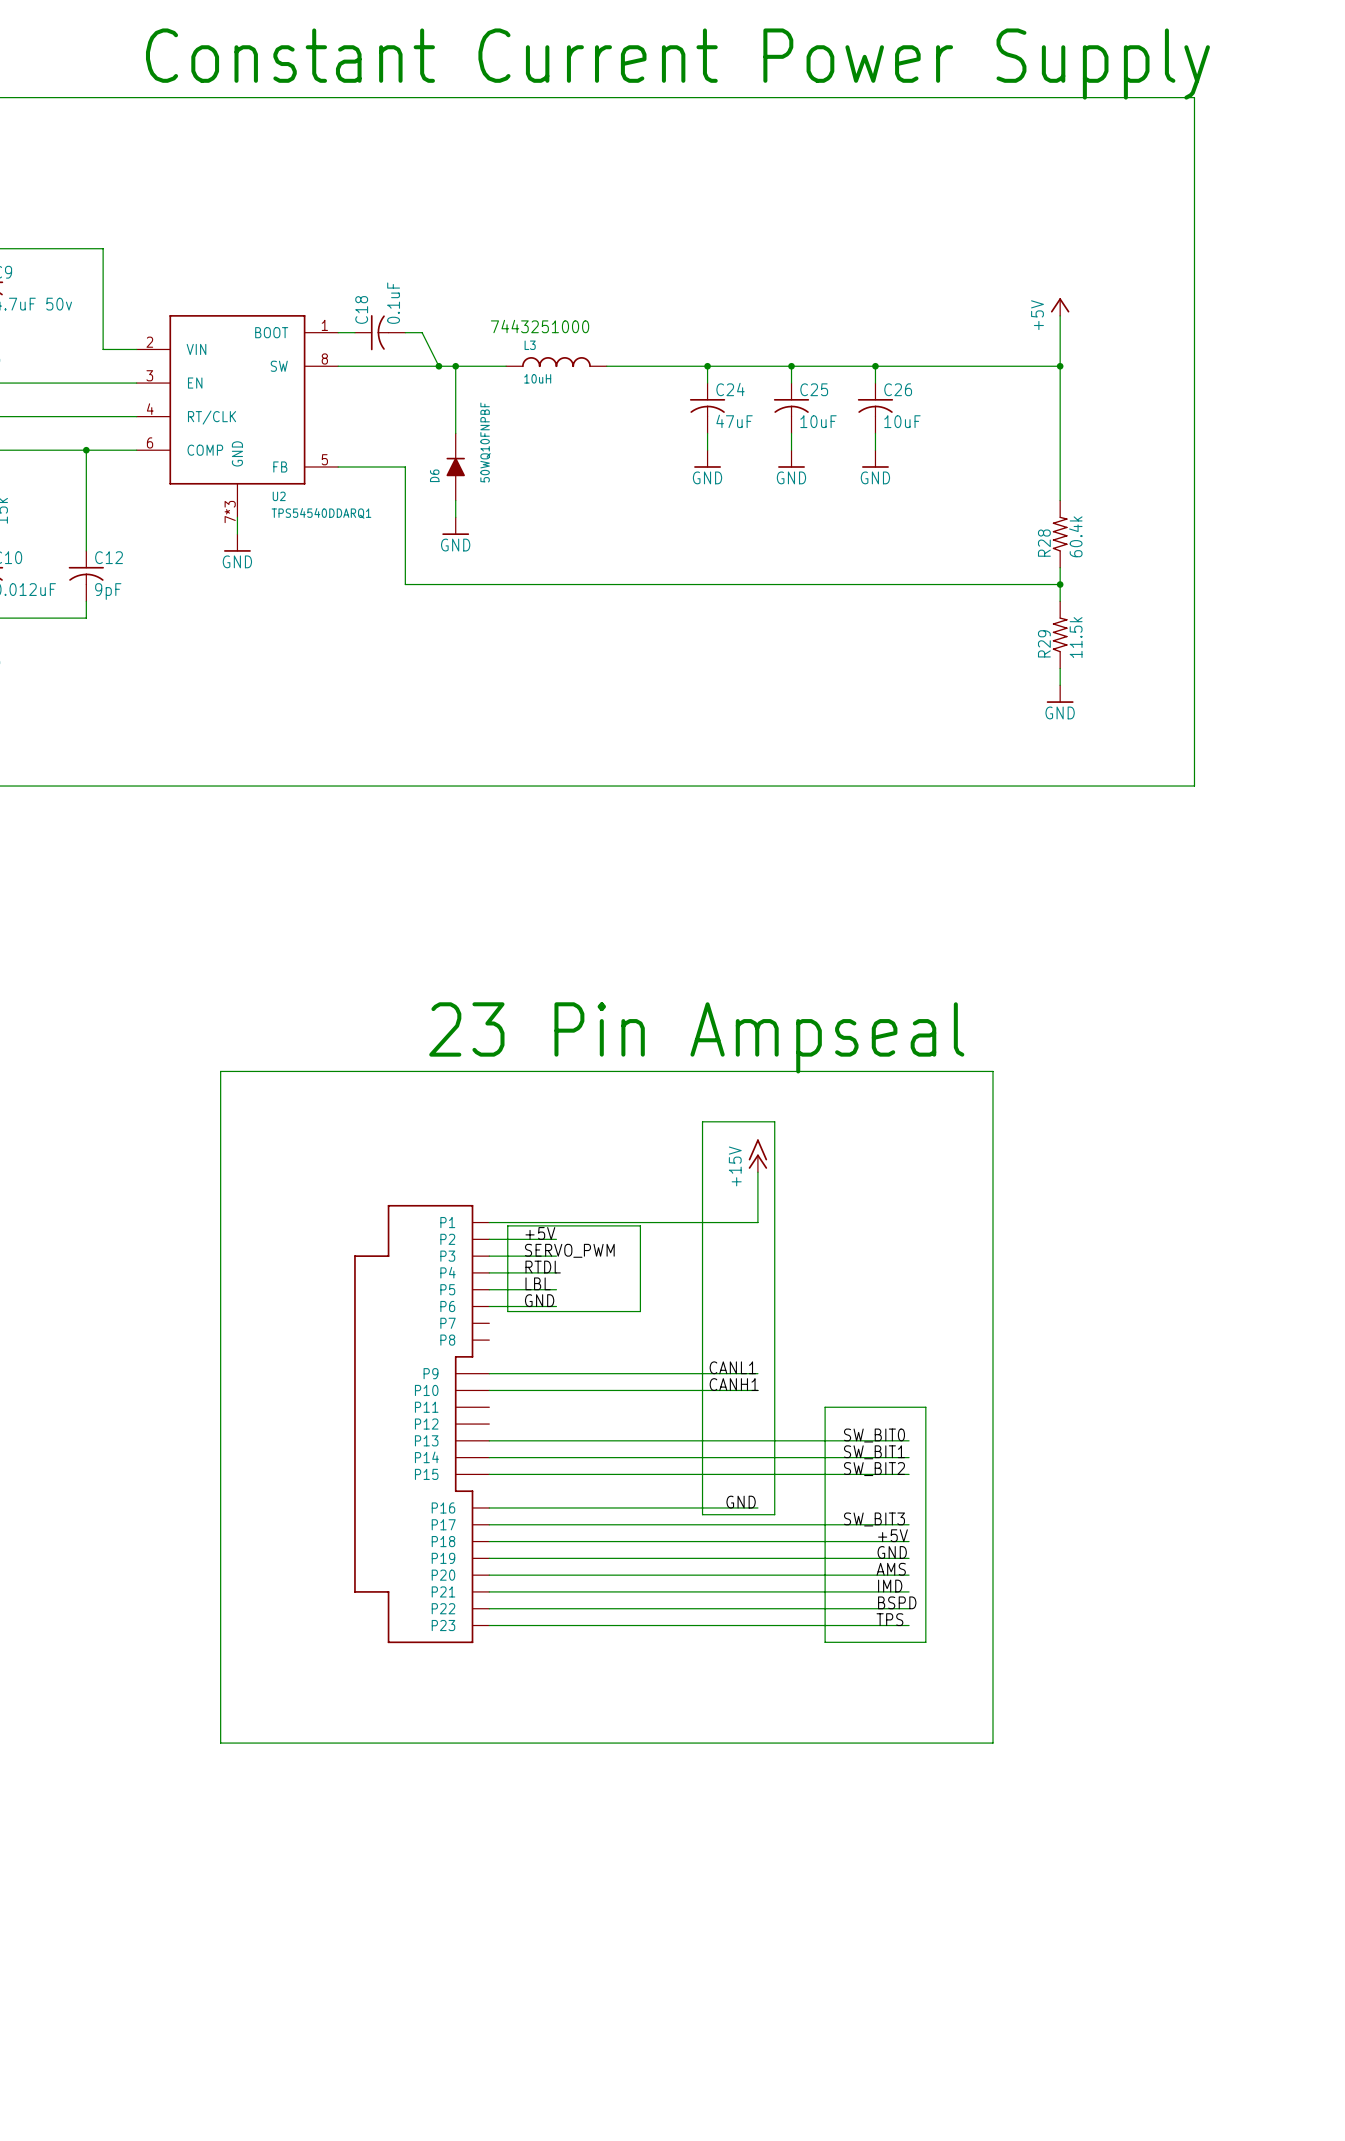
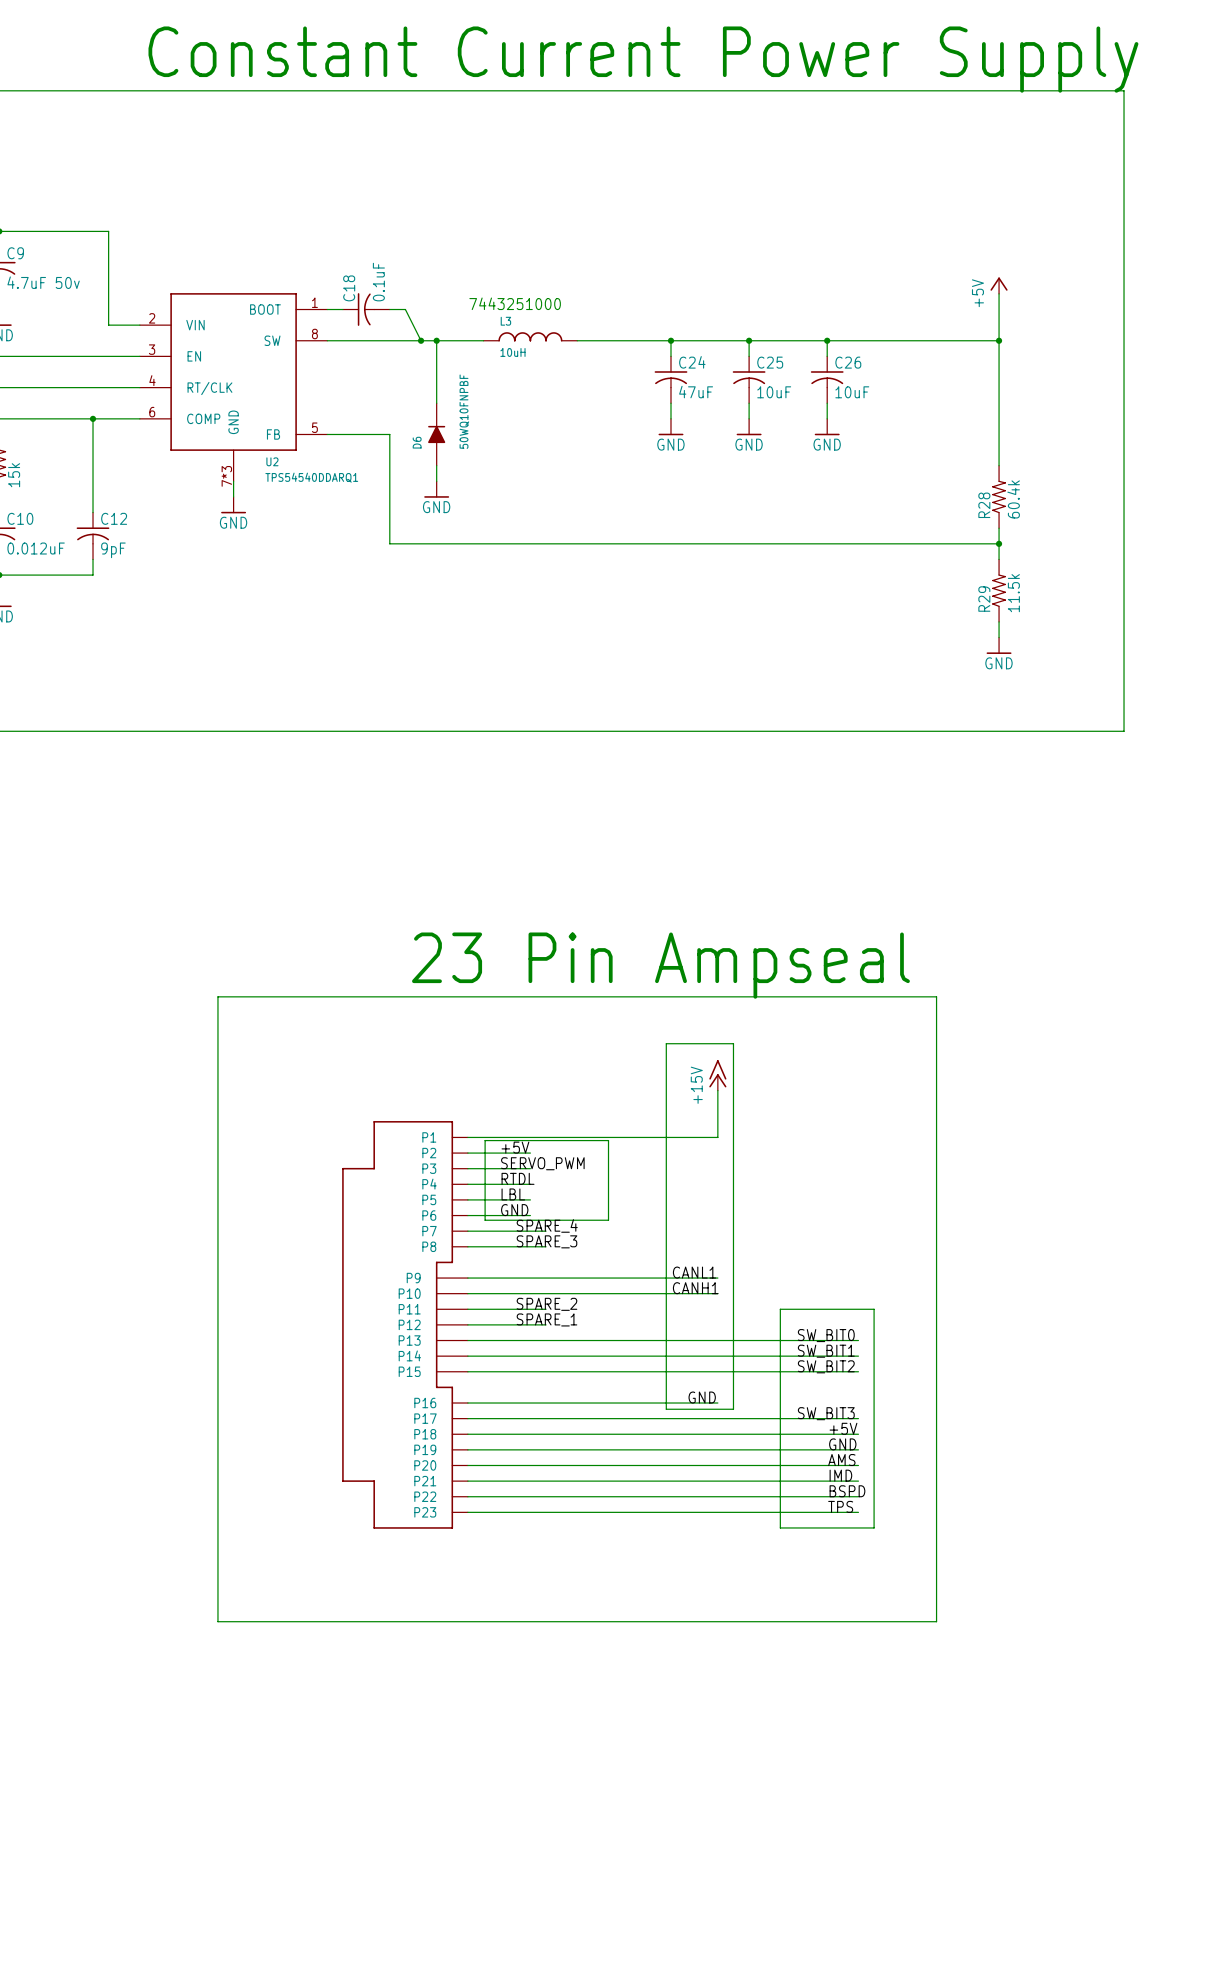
label: none -> SPARE_4 (547, 1225)
wire: none -> (467, 1231) (546, 1231)
label: none -> SPARE_3 (546, 1241)
wire: none -> (467, 1246) (546, 1246)
label: none -> SPARE_2 (546, 1304)
wire: none -> (467, 1309) (546, 1309)
label: none -> SPARE_1 (546, 1319)
wire: none -> (467, 1324) (546, 1324)

